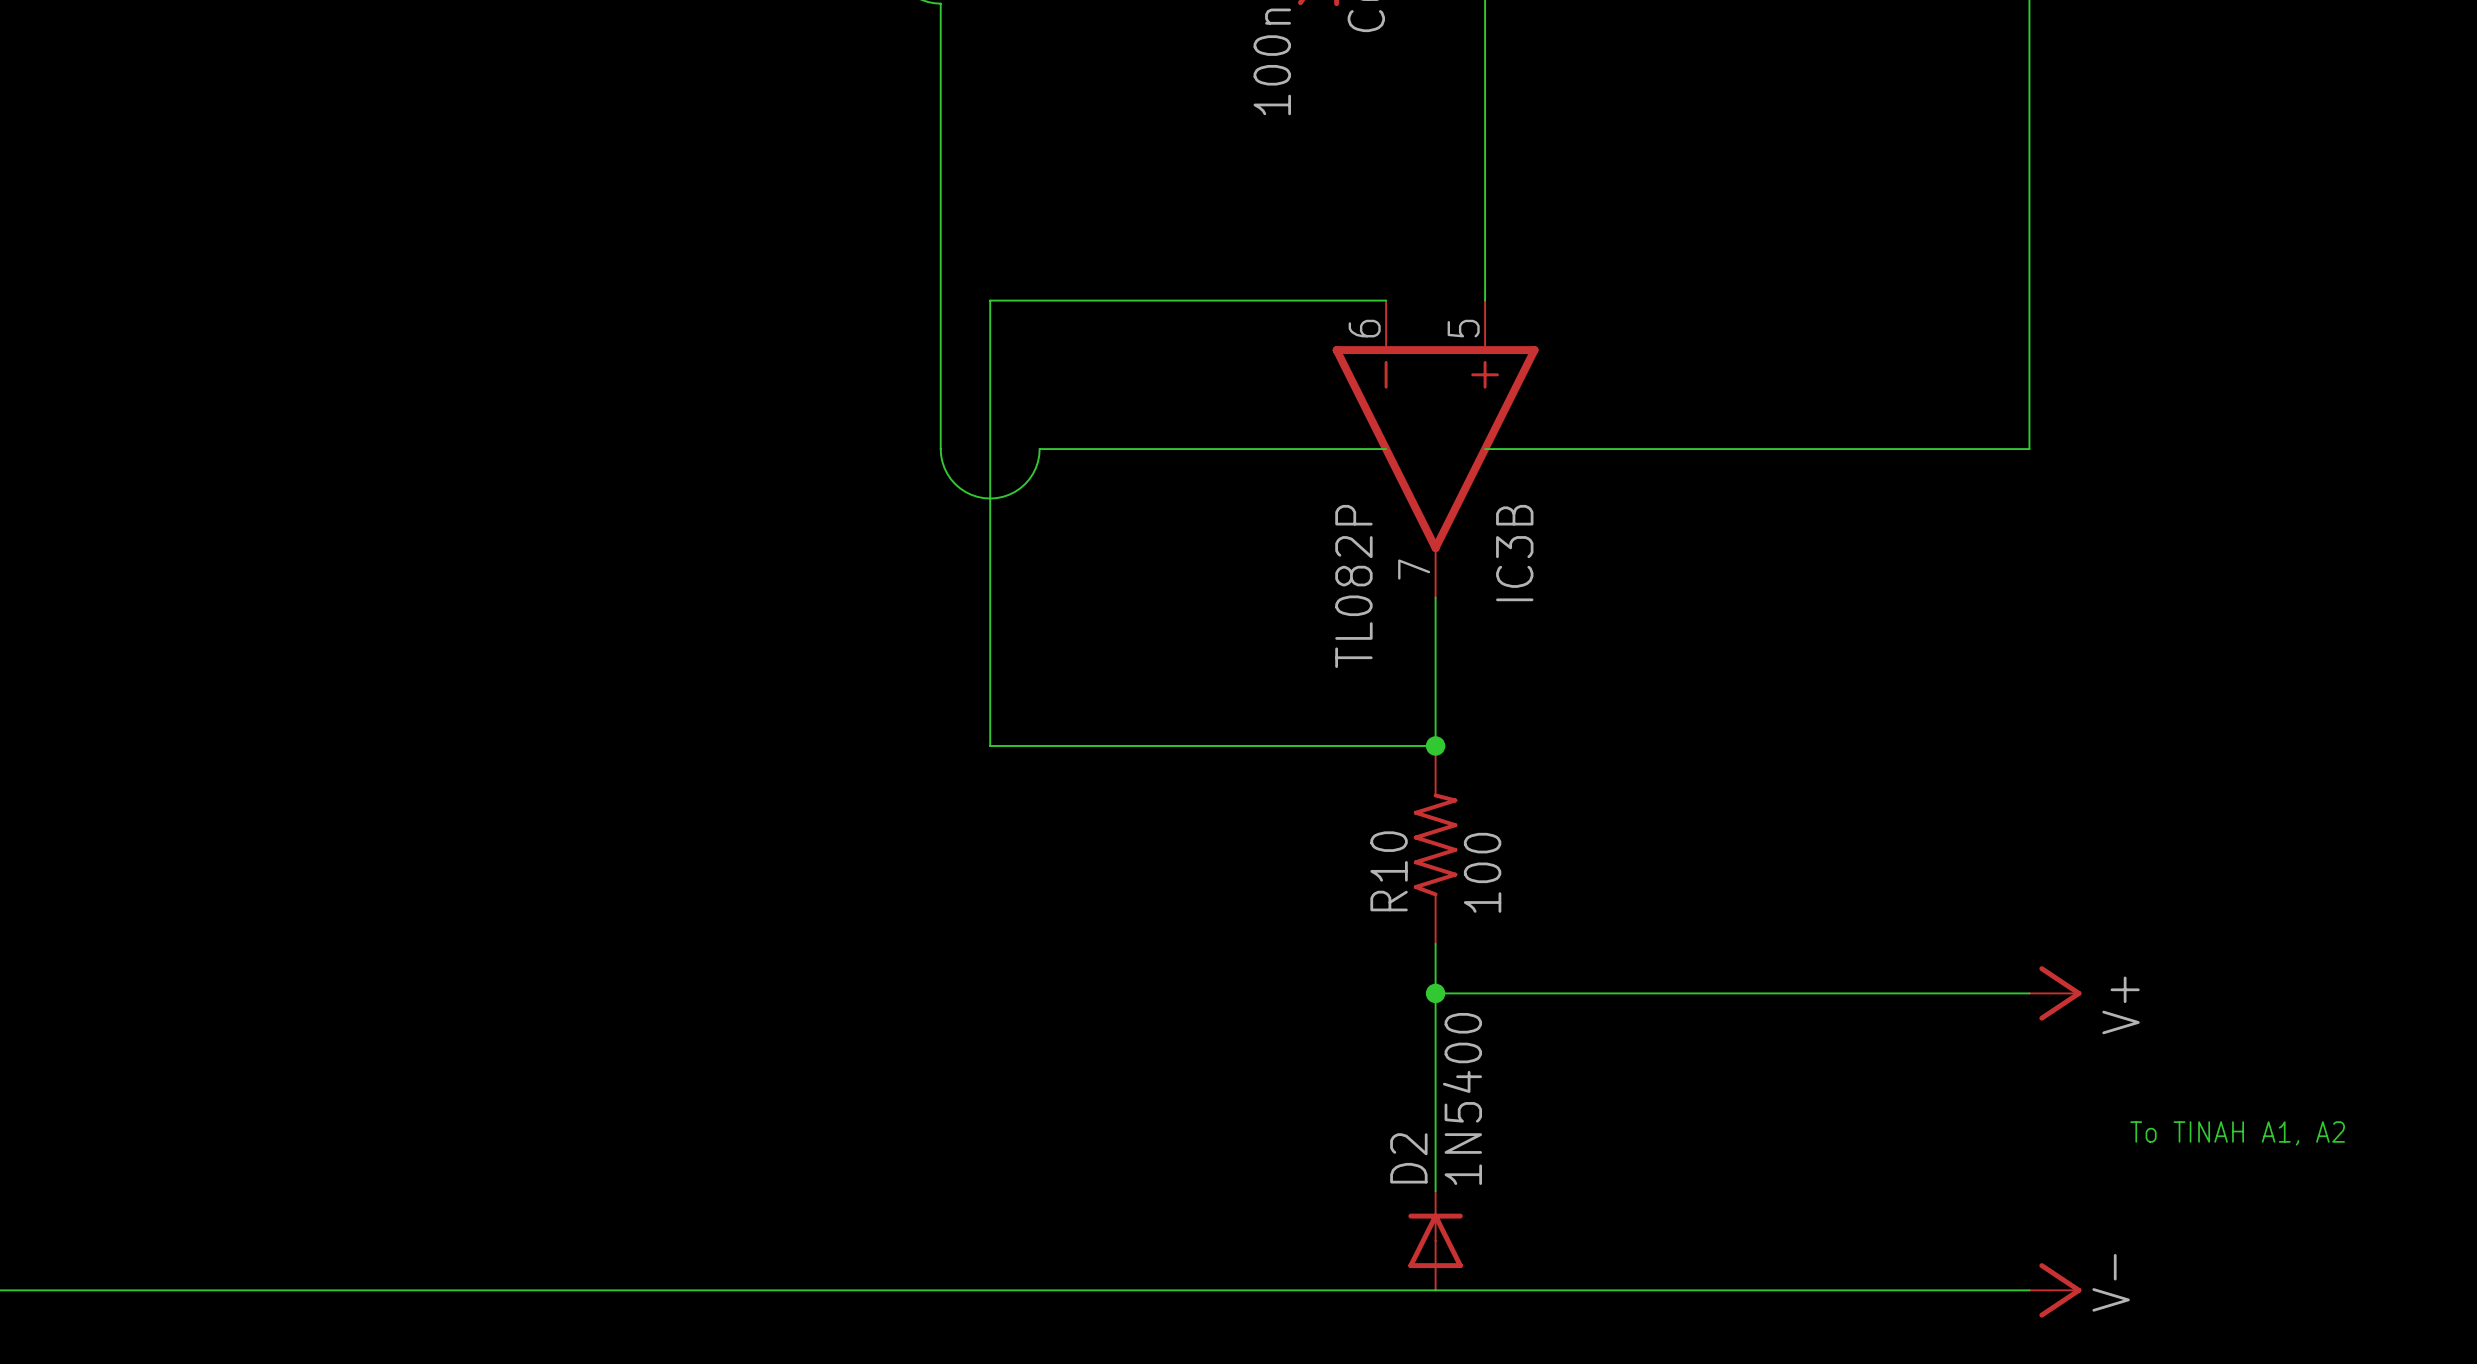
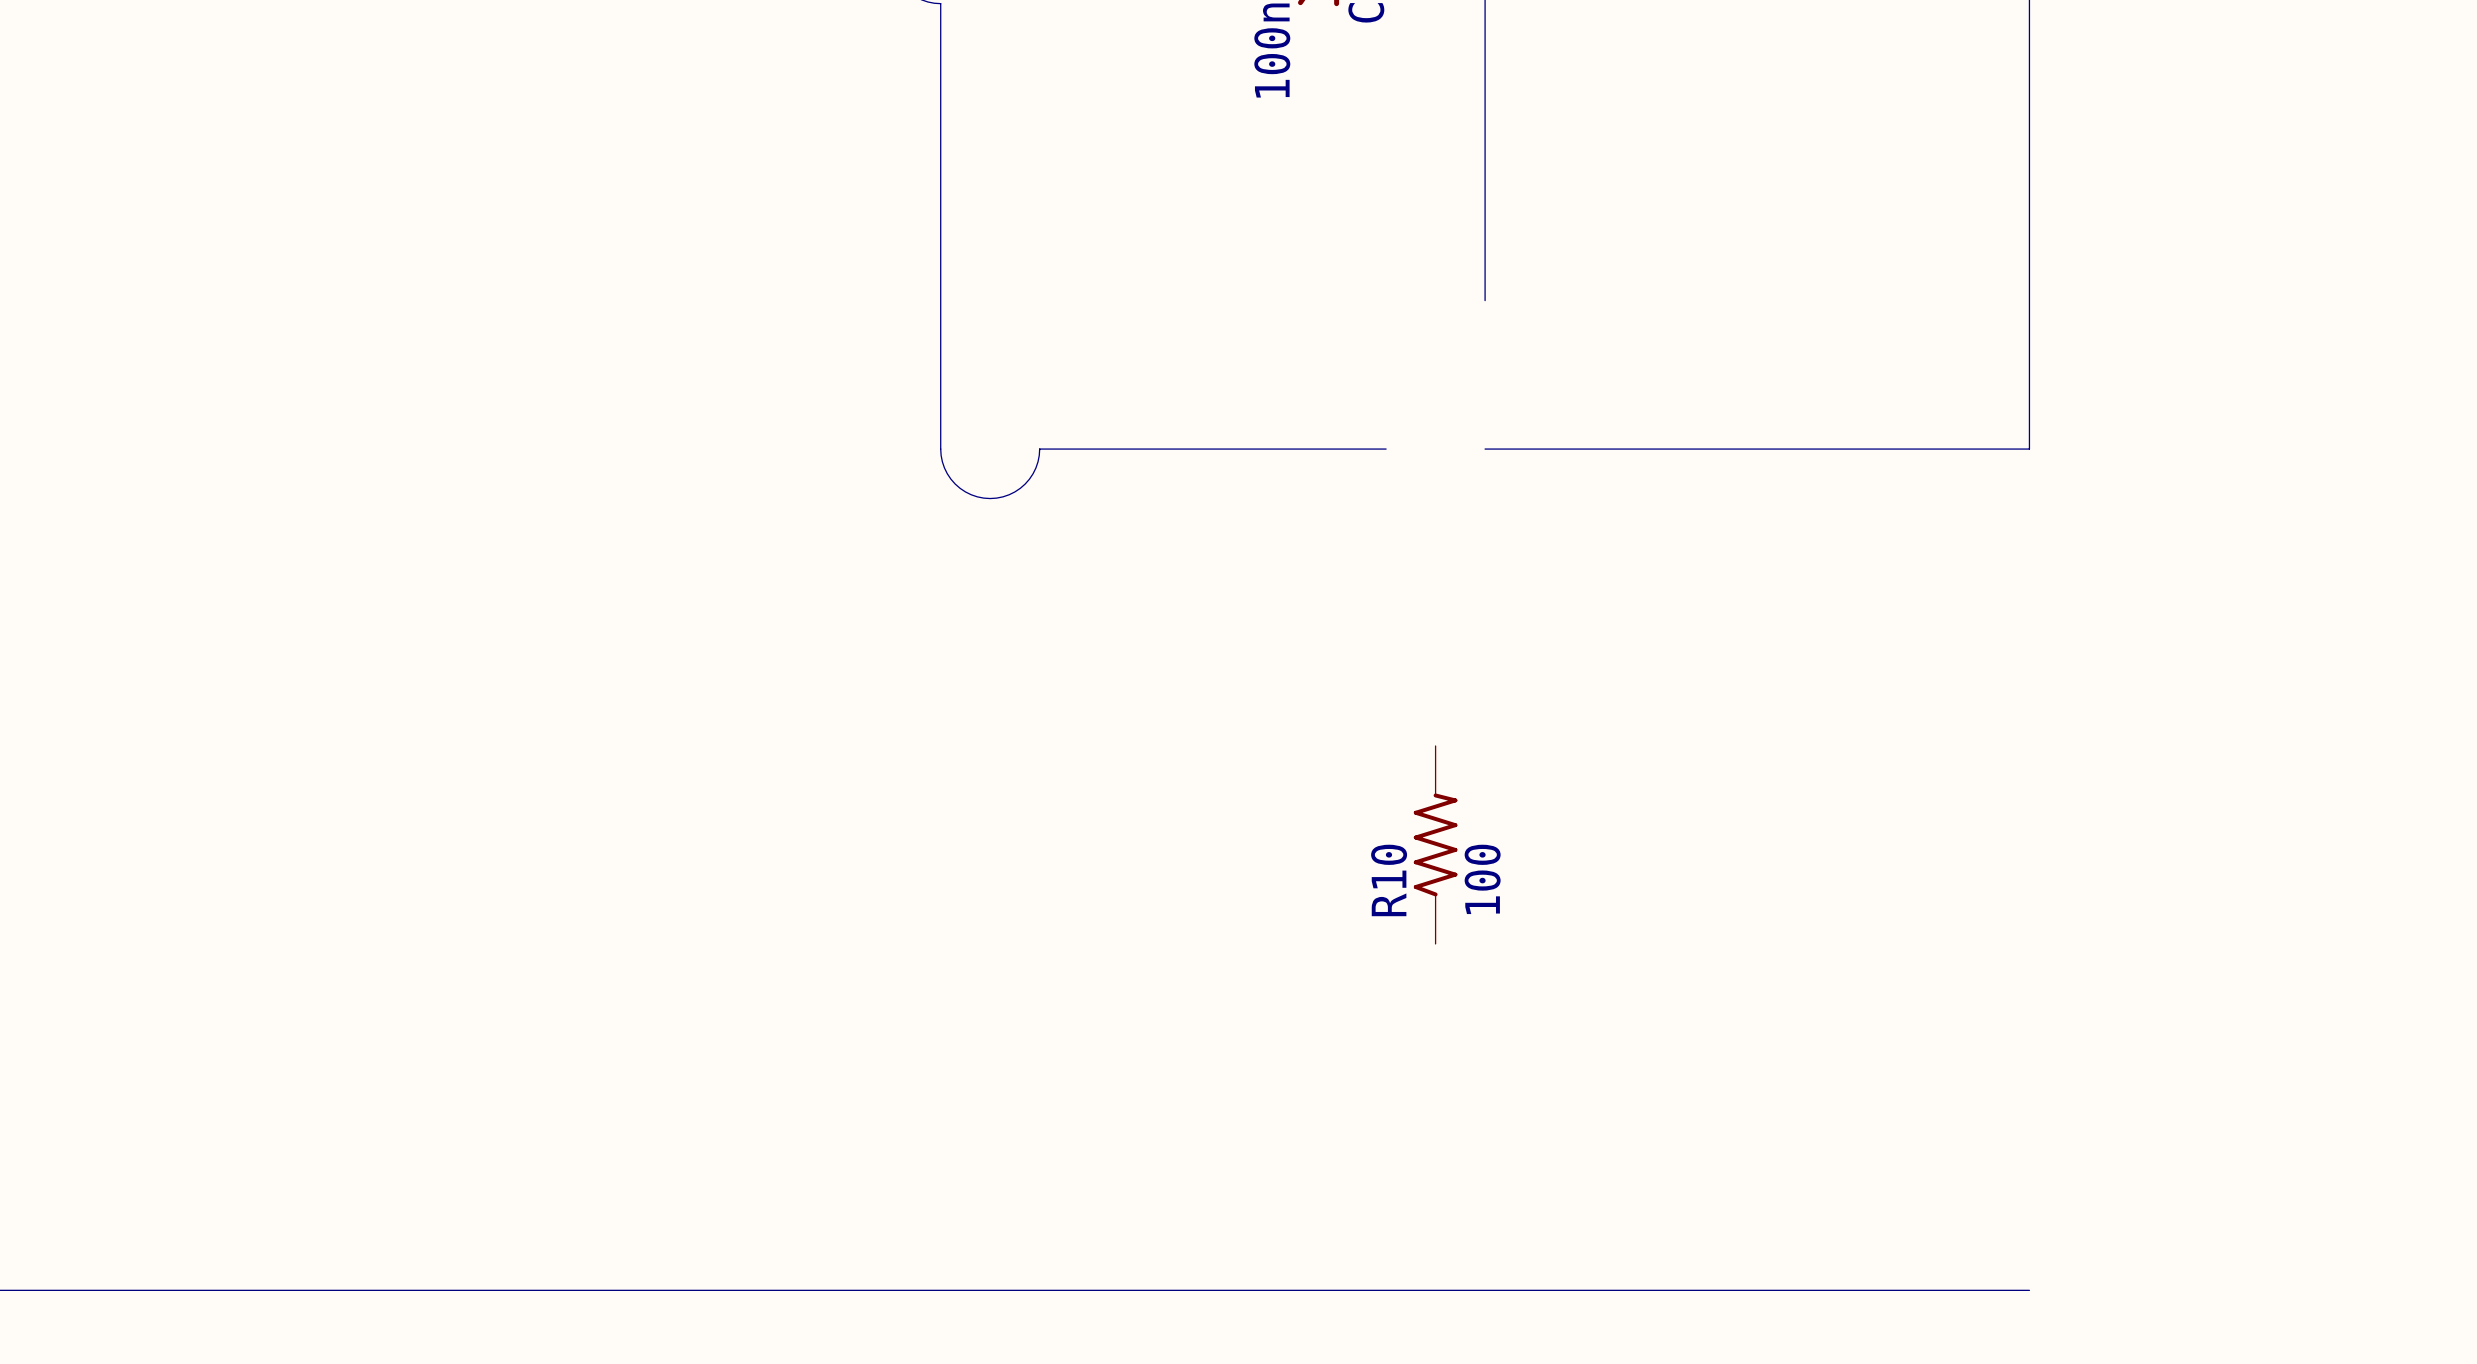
wire: (1386, 300) (990, 300) (990, 745) (1435, 745) (1435, 597) -> none
IC3B: TL082P (1435, 449) -> none
junction: (1435, 745) -> none
wire: (1435, 943) (1435, 1191) -> none
wire: (1435, 993) (2029, 993) -> none
junction: (1435, 993) -> none
power symbol: V+ (2055, 993) -> none
text: To TINAH A1, A2 (2237, 1133) -> none
D2: 1N5400 (1435, 1240) -> none
power symbol: V- (2055, 1290) -> none

